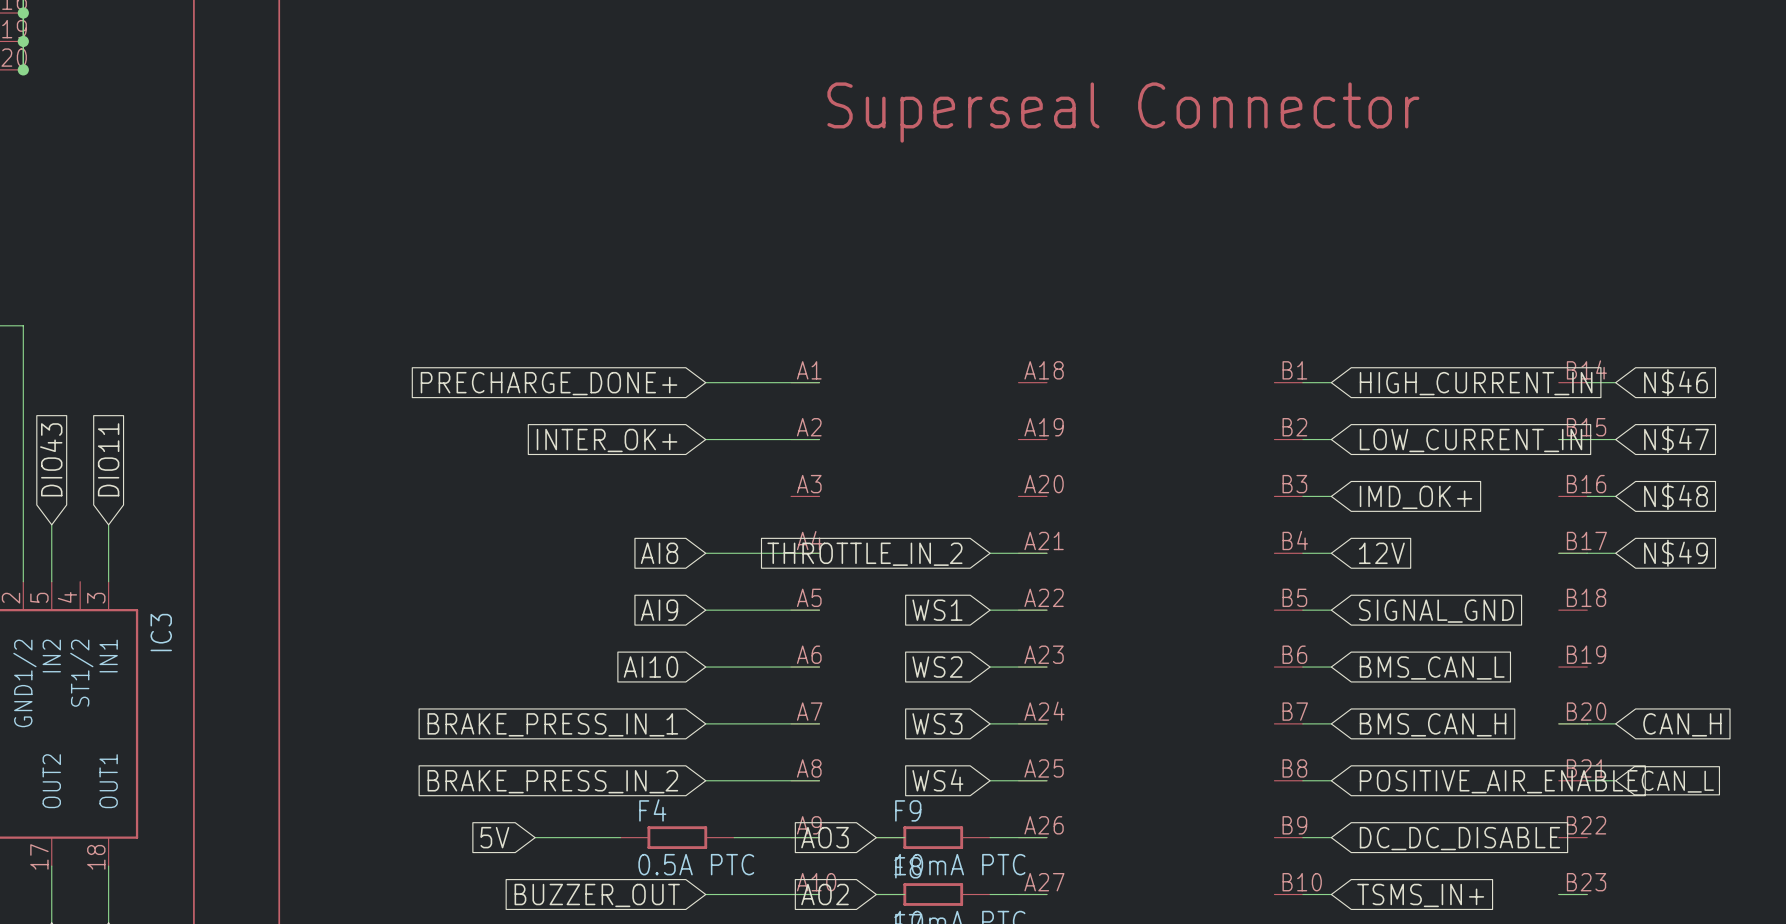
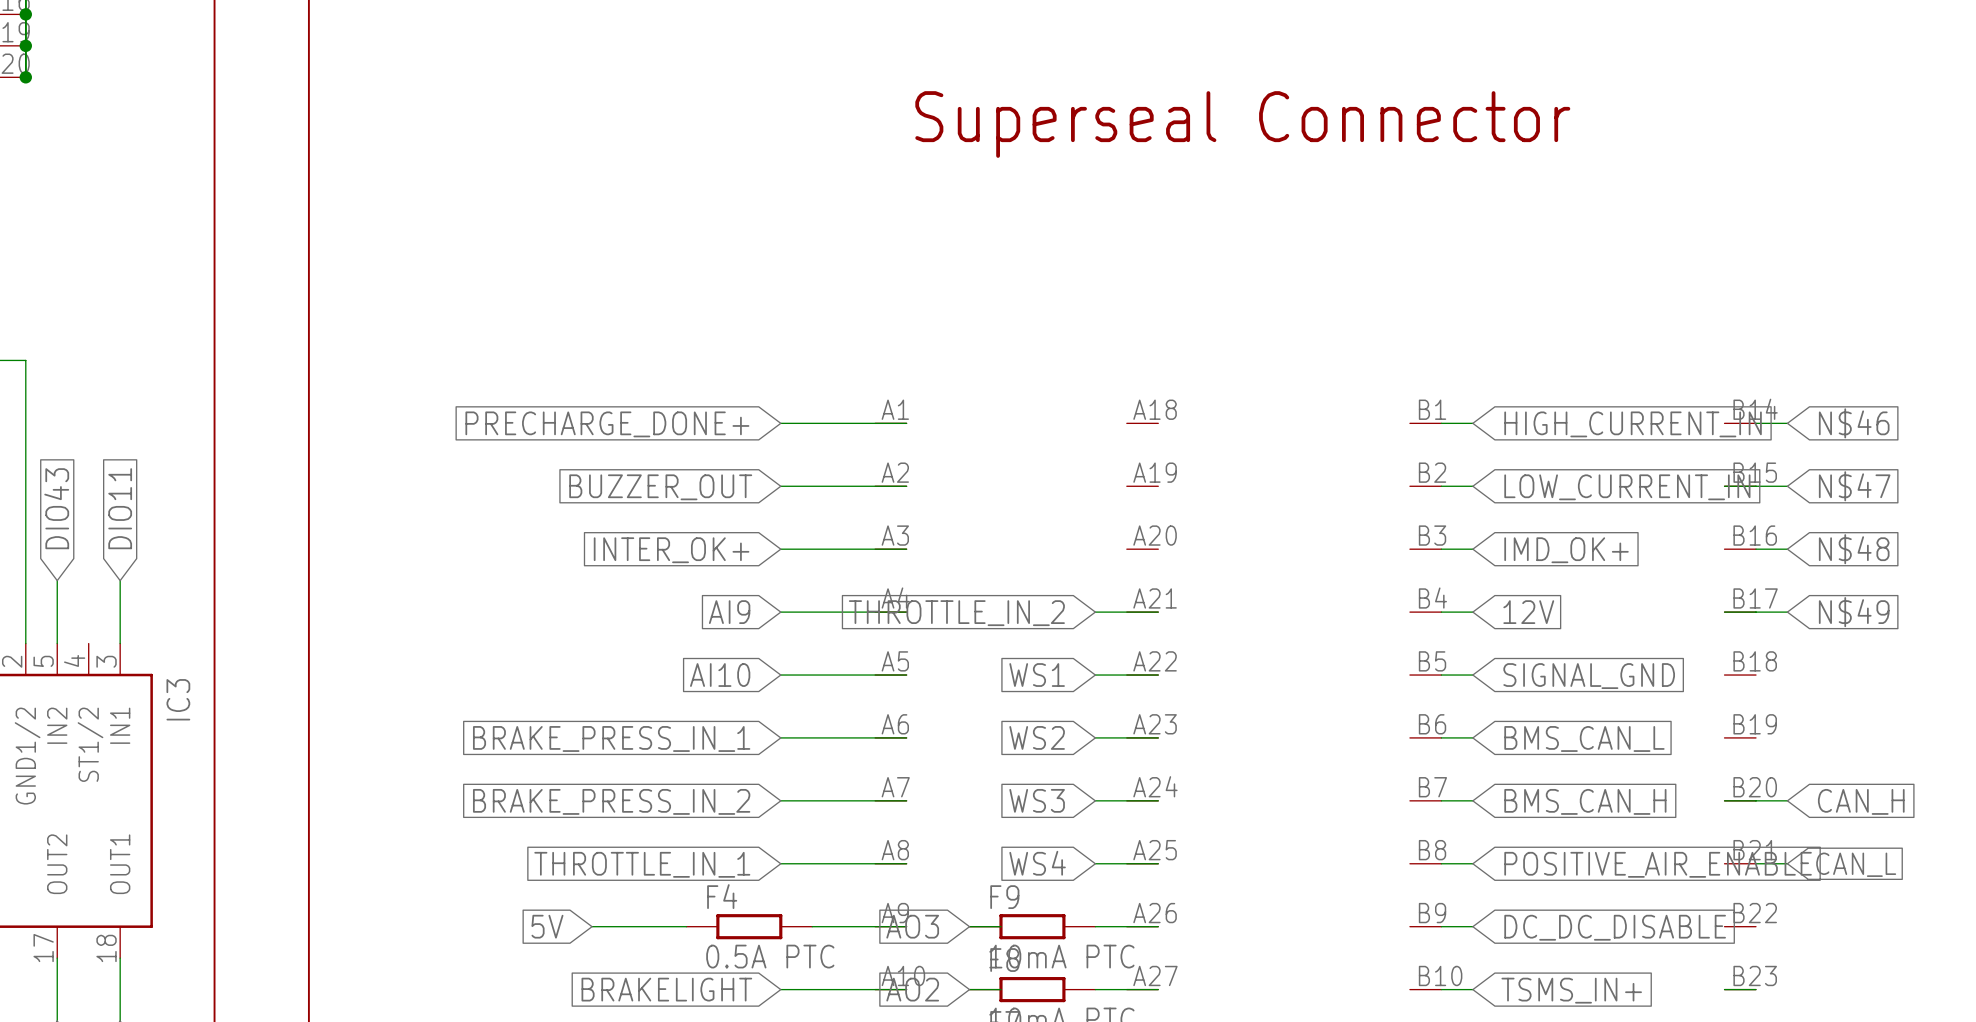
global label: INTER_OK+ (607, 440) -> BUZZER_OUT (660, 487)
wire: none -> (780, 549) (906, 549)
global label: none -> INTER_OK+ (671, 550)
global label: AI8 (659, 553) -> AI9 (729, 612)
global label: AI9 (659, 610) -> AI10 (720, 675)
global label: AI10 (650, 667) -> BRAKE_PRESS_IN_1 (611, 738)
global label: BRAKE_PRESS_IN_1 (552, 724) -> BRAKE_PRESS_IN_2 (611, 801)
global label: BRAKE_PRESS_IN_2 (552, 781) -> THROTTLE_IN_1 (642, 864)
global label: BUZZER_OUT (597, 895) -> BRAKELIGHT (666, 989)

